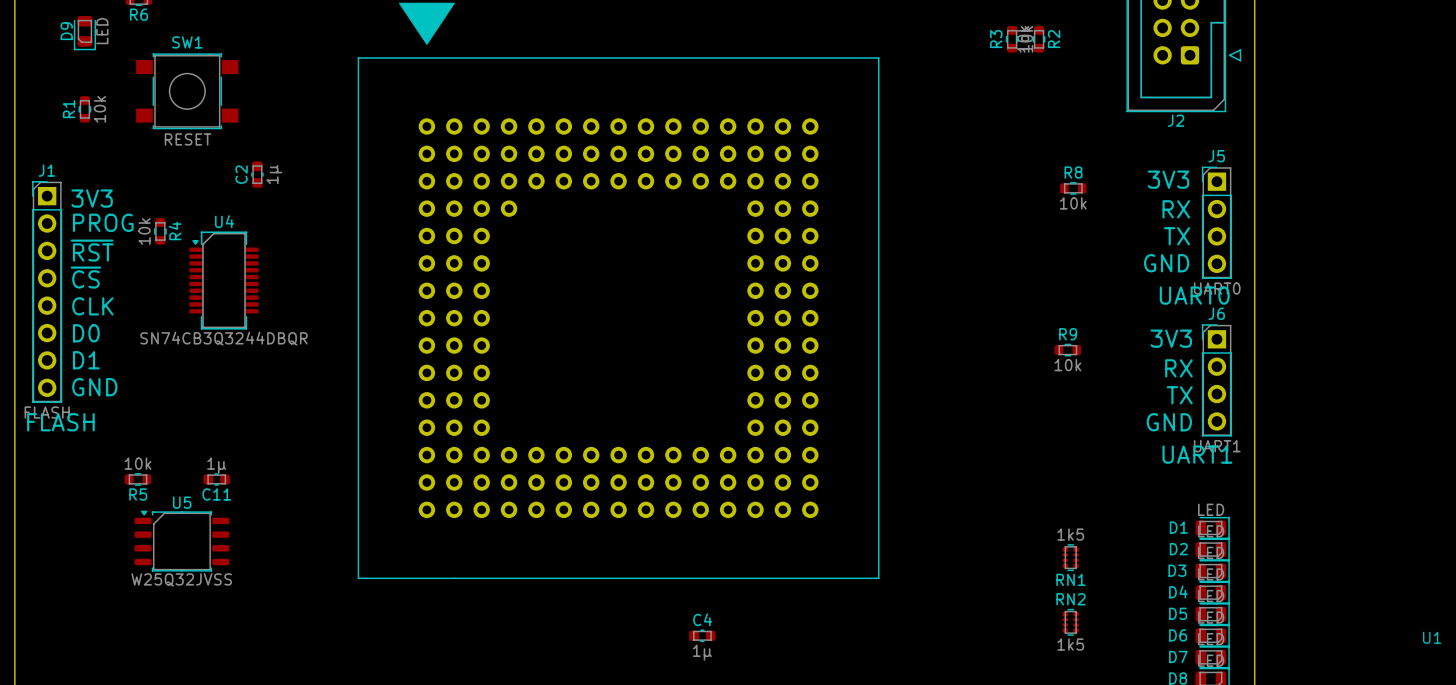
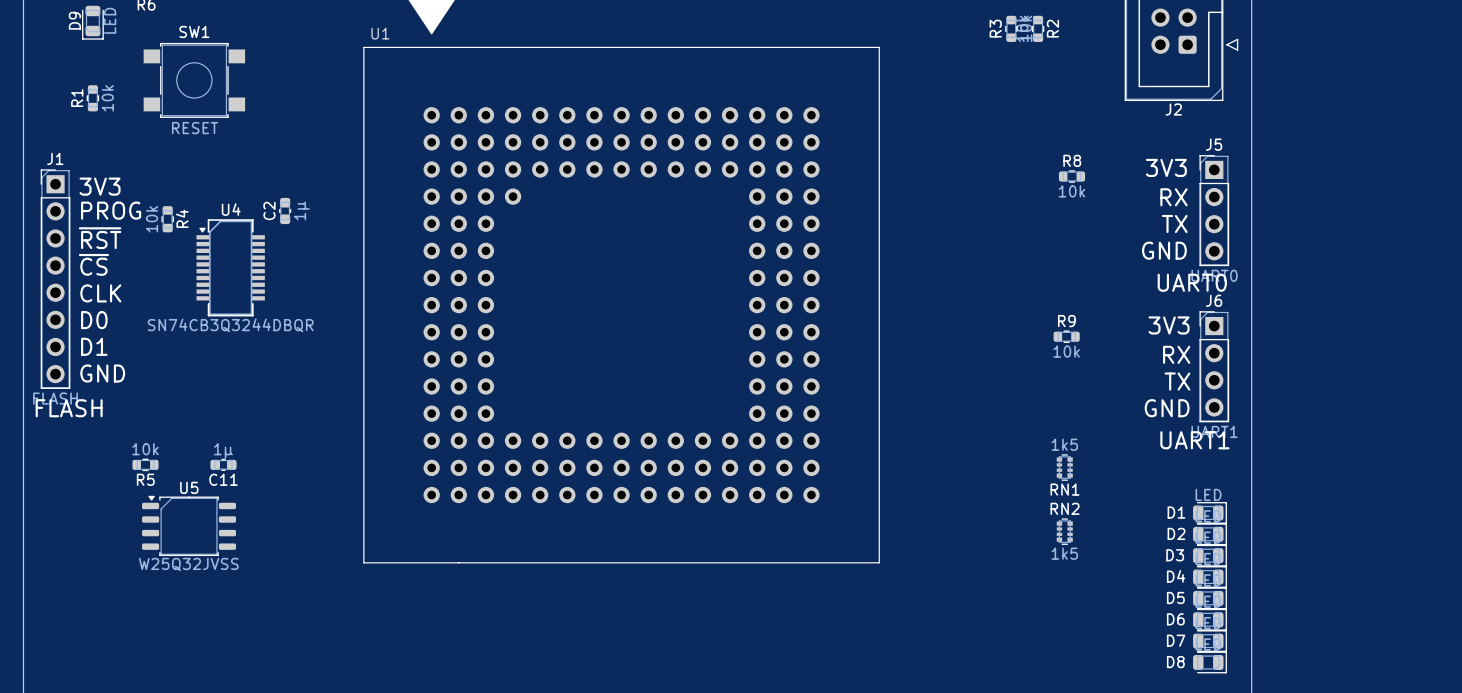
C2 position: (257, 174) -> (285, 210)
RN1 position: (1070, 557) -> (1064, 467)
RN2 position: (1070, 622) -> (1064, 531)
C4: 1µ (702, 635) -> none
U1 name position: U1 (1432, 637) -> U1 (380, 33)

